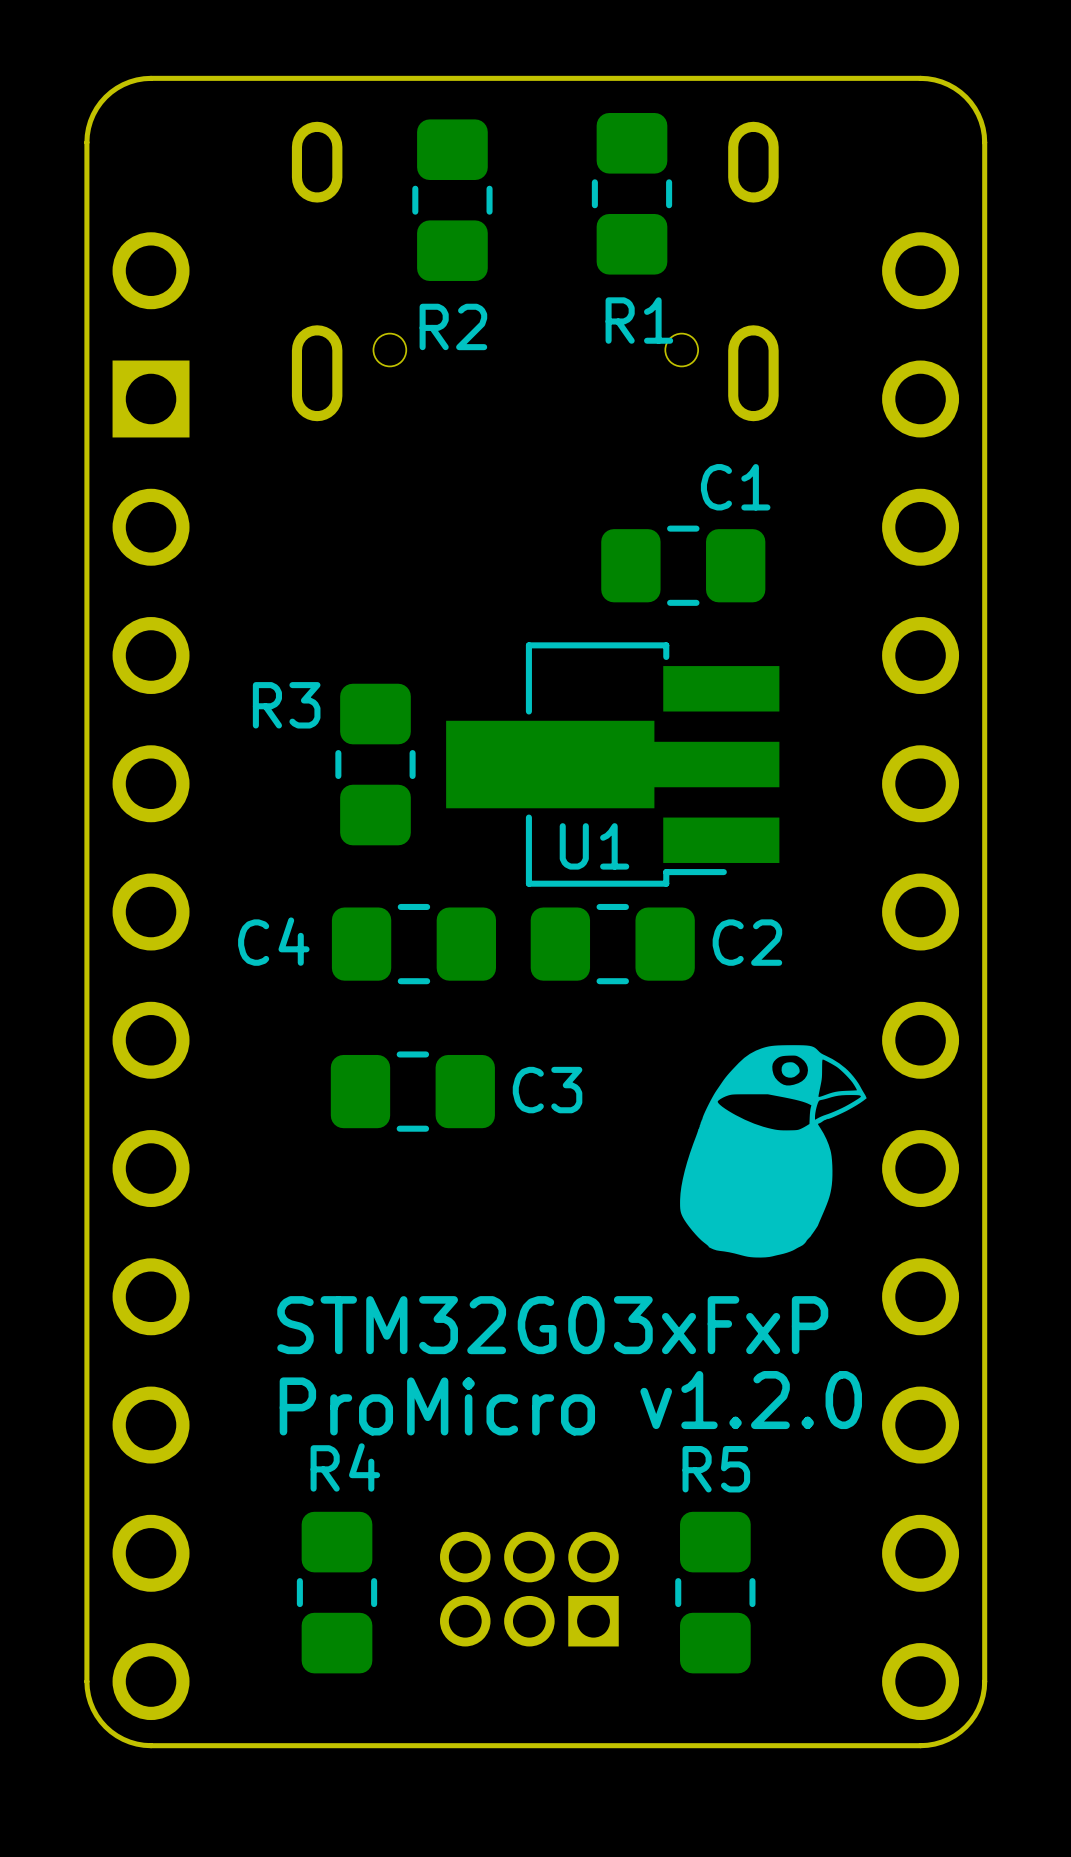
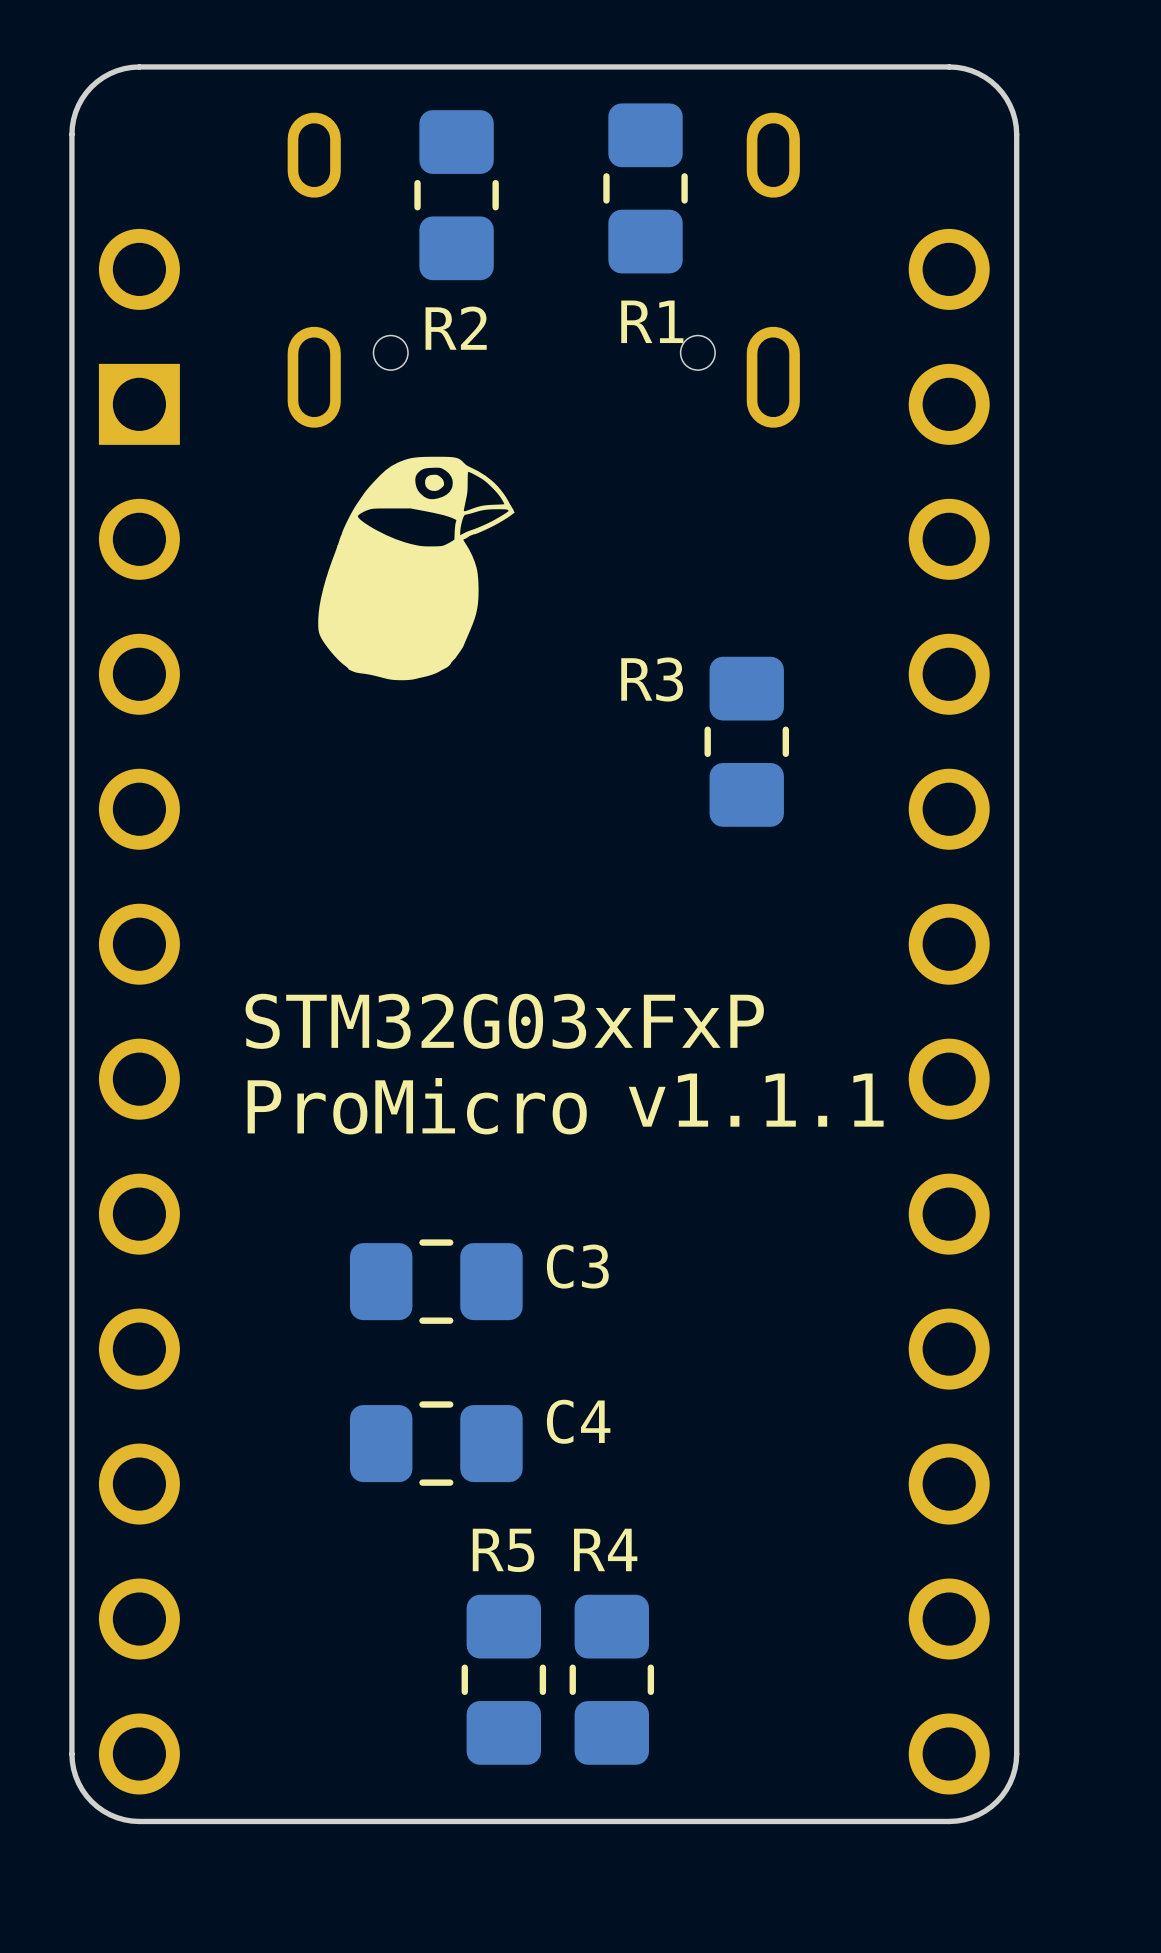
C1: (683, 565) -> none
R3 position: (375, 764) -> (746, 741)
U1: (612, 764) -> none
C4 name position: C4 (273, 941) -> C4 (578, 1421)
C4 position: (413, 944) -> (436, 1443)
C2: (612, 944) -> none
text: none -> v1.1.1 (756, 1100)
C3 name position: C3 (547, 1090) -> C3 (577, 1266)
C3 position: (412, 1091) -> (436, 1281)
drawing position: (773, 1151) -> (416, 568)
text position: STM32G03xFxP (552, 1325) -> STM32G03xFxP (504, 1021)
text: v1.2.0 (751, 1400) -> none
text position: ProMicro (437, 1406) -> ProMicro (417, 1106)
R4 name position: R4 (345, 1467) -> R4 (605, 1549)
R5 name position: R5 (716, 1469) -> R5 (503, 1550)
part: (529, 1589) -> none
R4 position: (337, 1592) -> (503, 1679)
R5 position: (715, 1592) -> (611, 1679)

